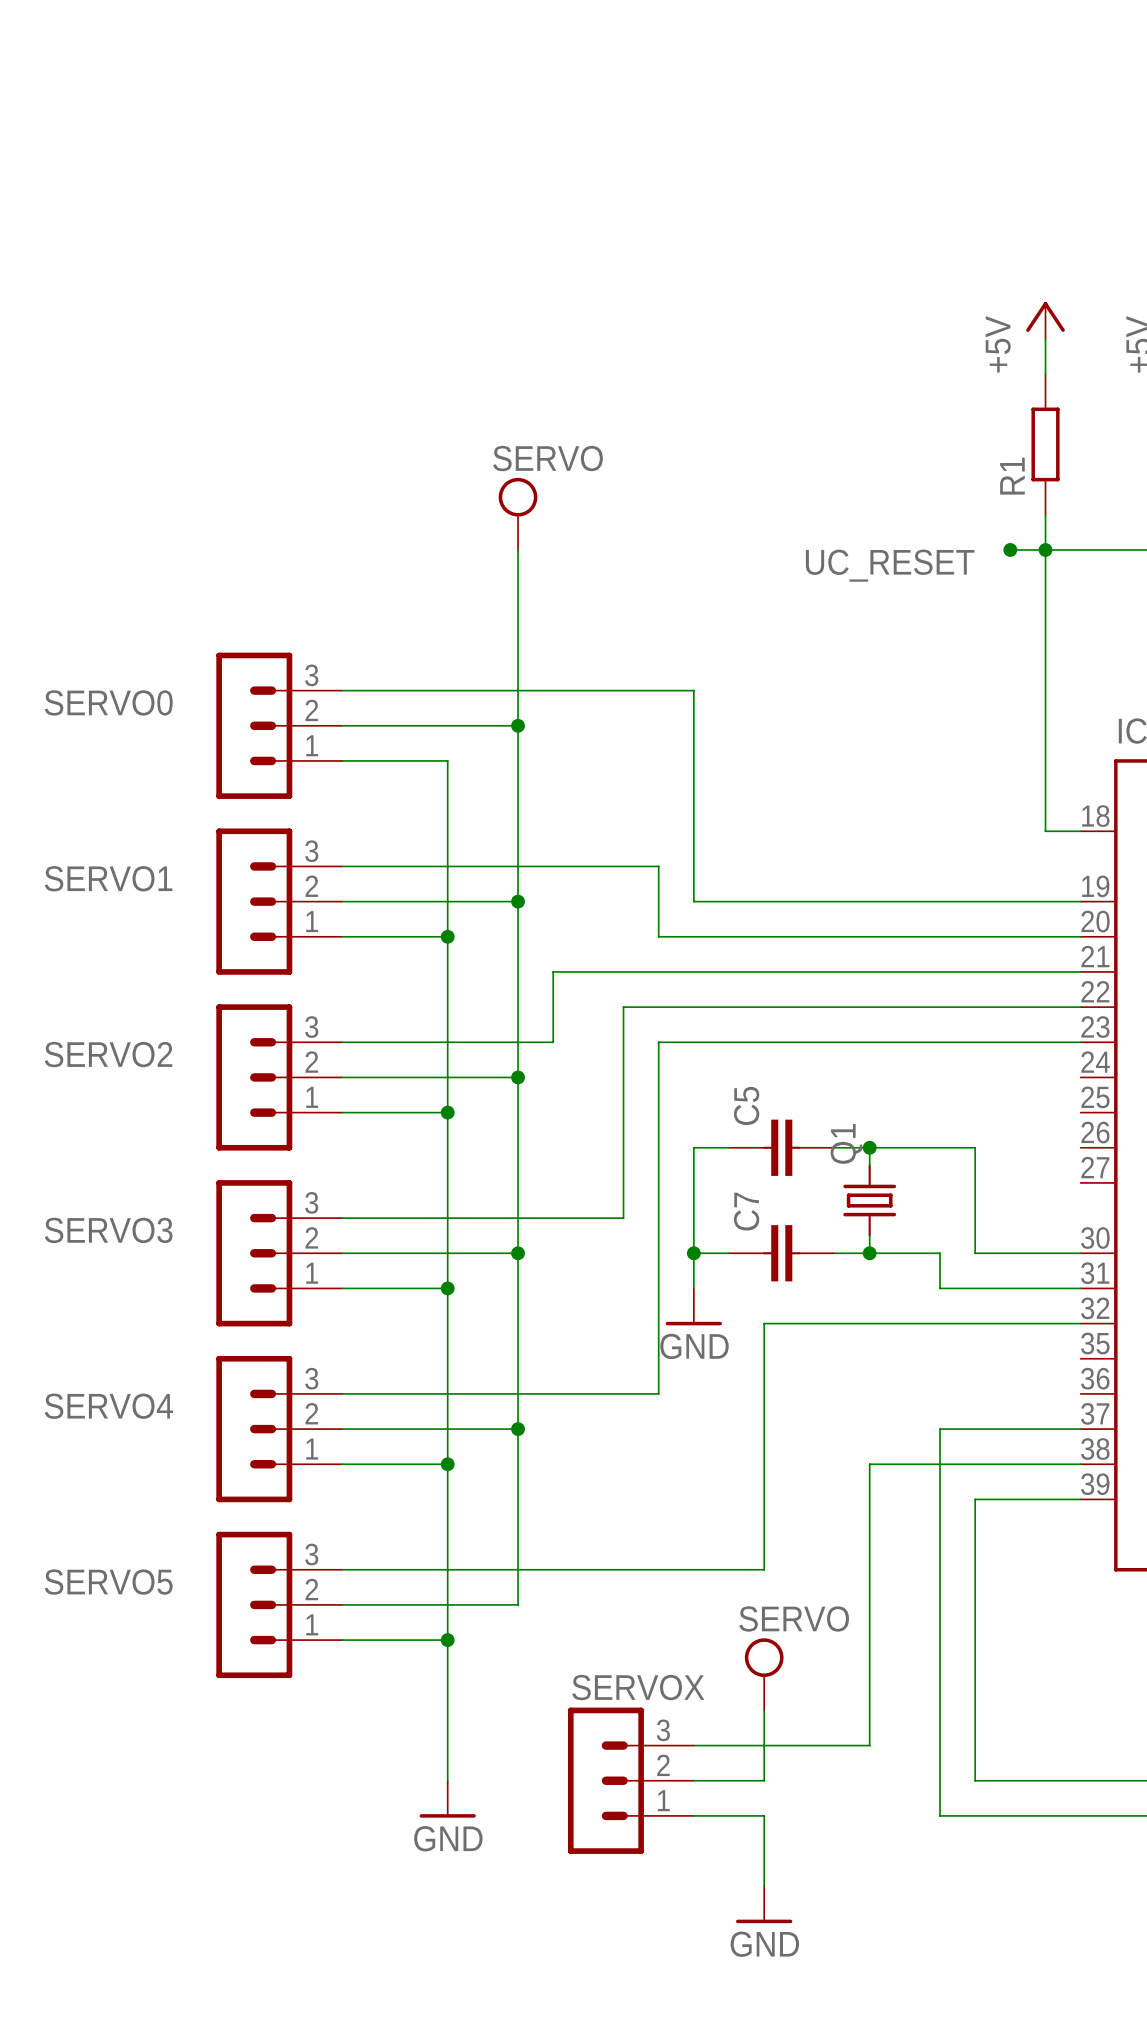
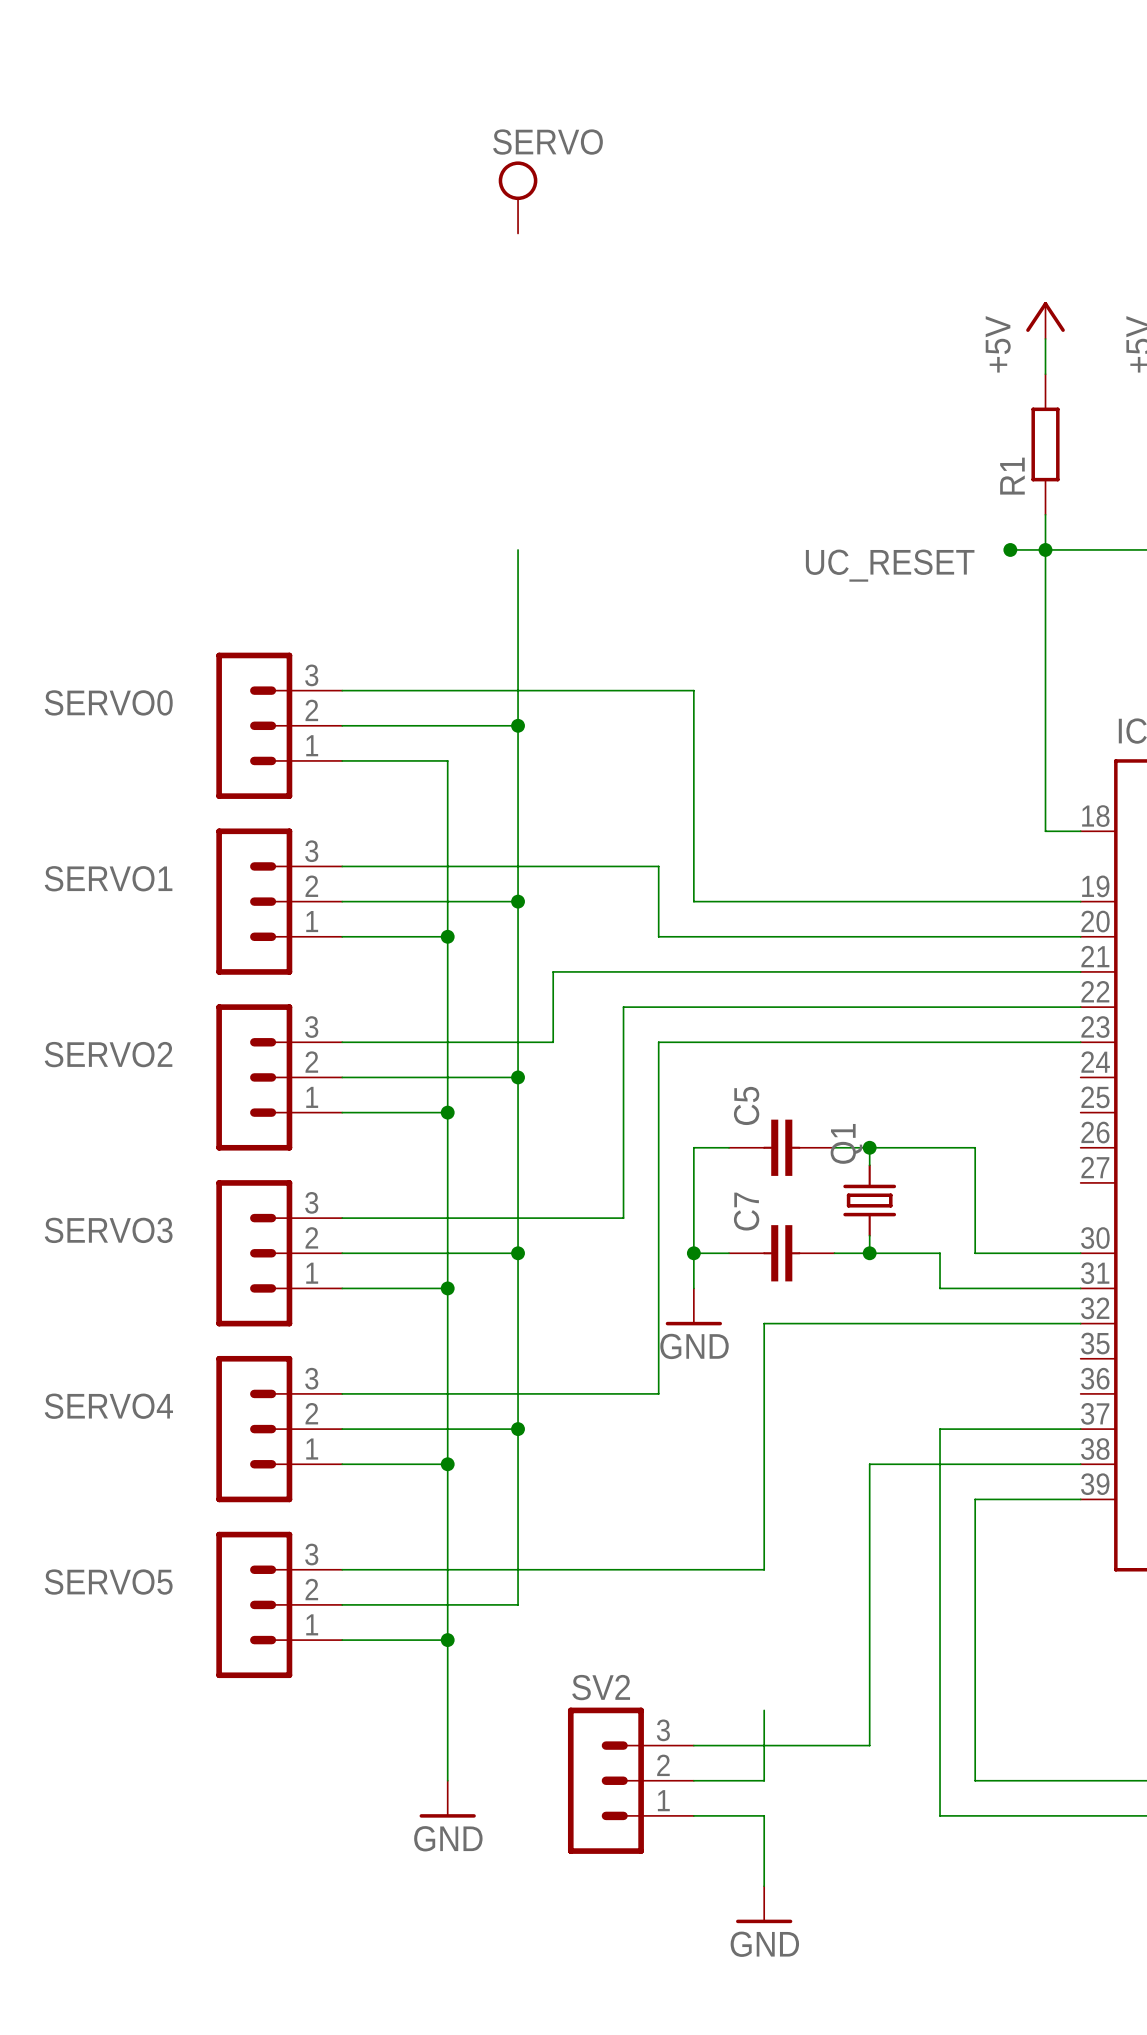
power symbol position: SERVO (518, 513) -> SERVO (518, 197)
power symbol: SERVO (764, 1674) -> none
SERVOX name: SERVOX (638, 1687) -> SV2 (601, 1687)

